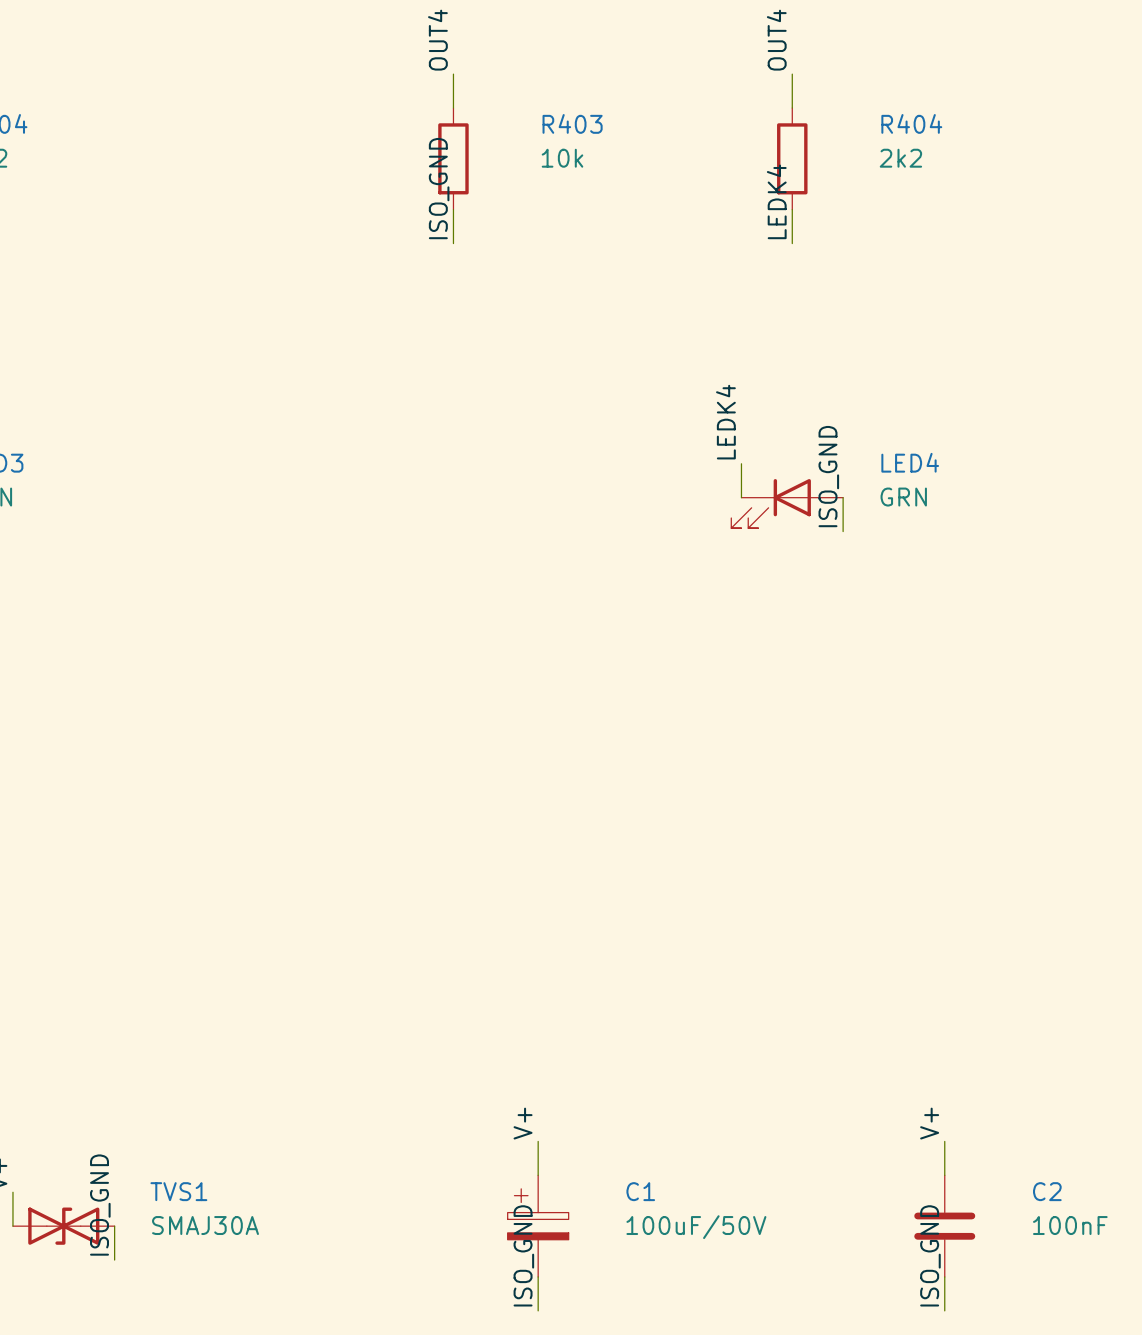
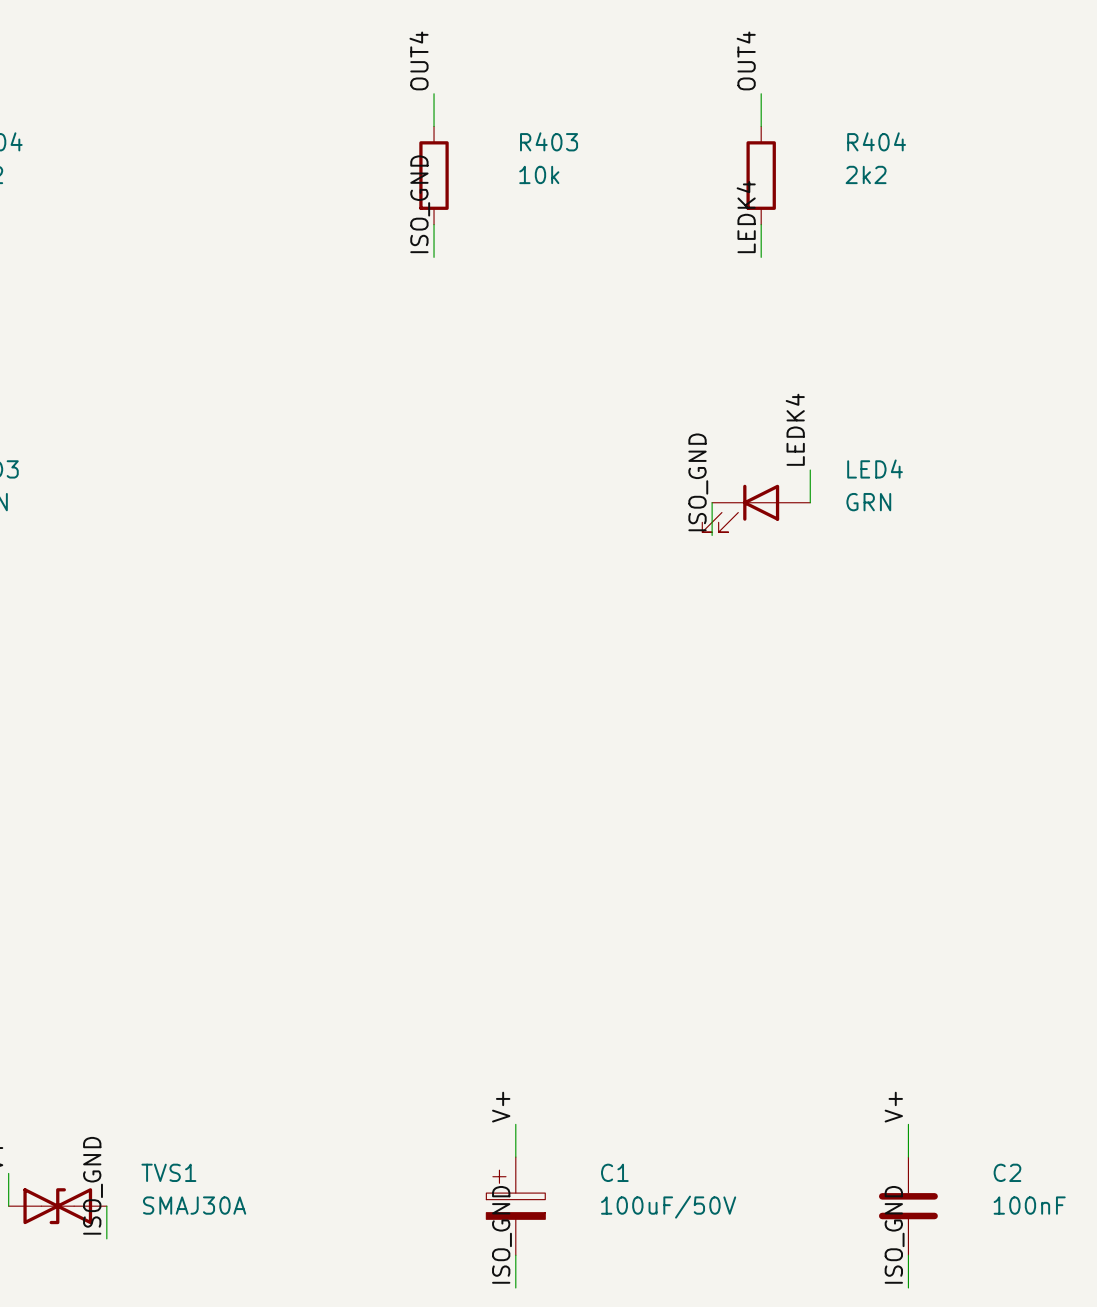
label position: LEDK4 (725, 422) -> LEDK4 (795, 429)
wire: (741, 463) (741, 497) -> (712, 535) (712, 502)
label position: ISO_GND (828, 476) -> ISO_GND (698, 482)
wire: (843, 497) (843, 531) -> (810, 502) (810, 470)

